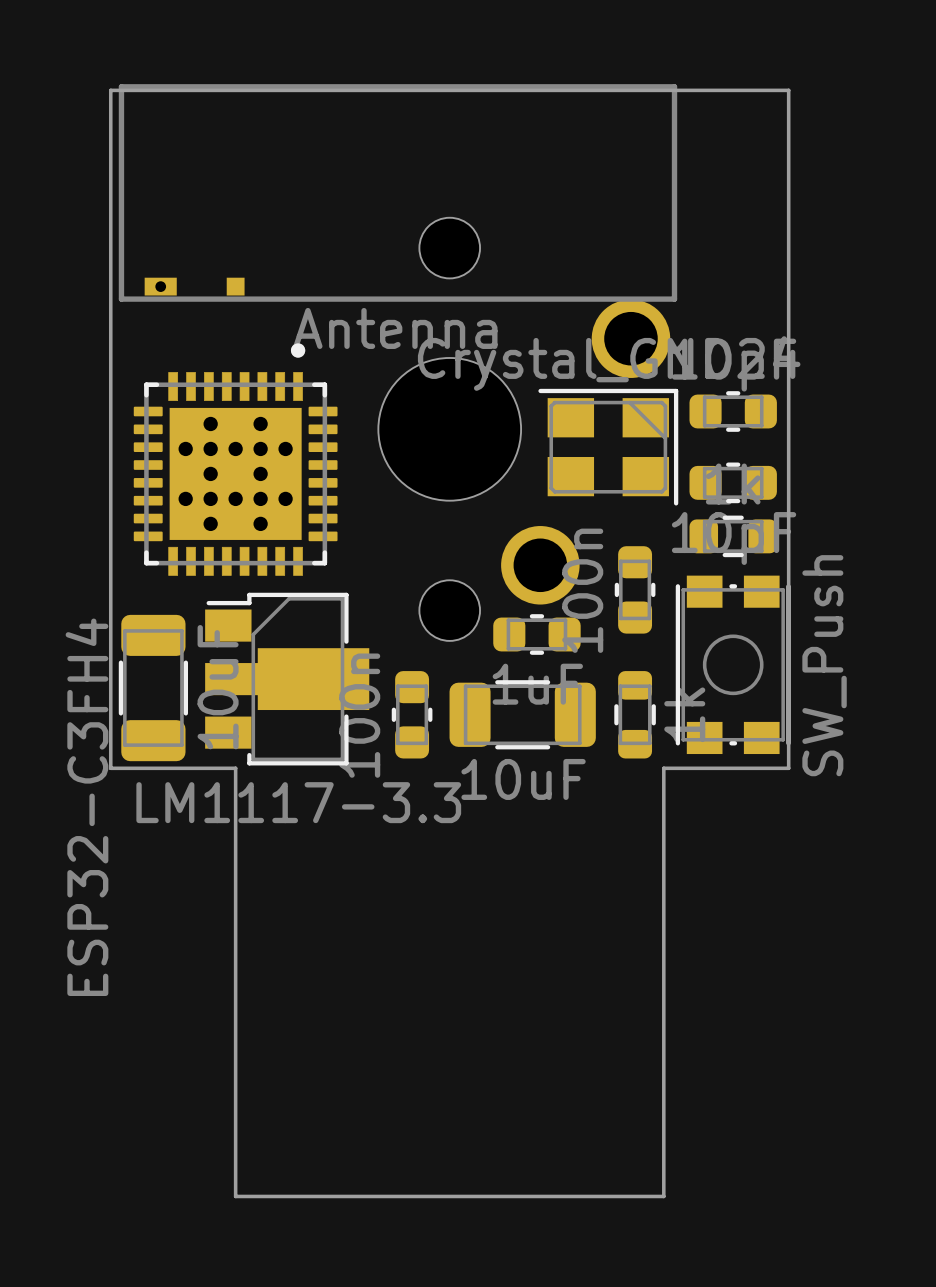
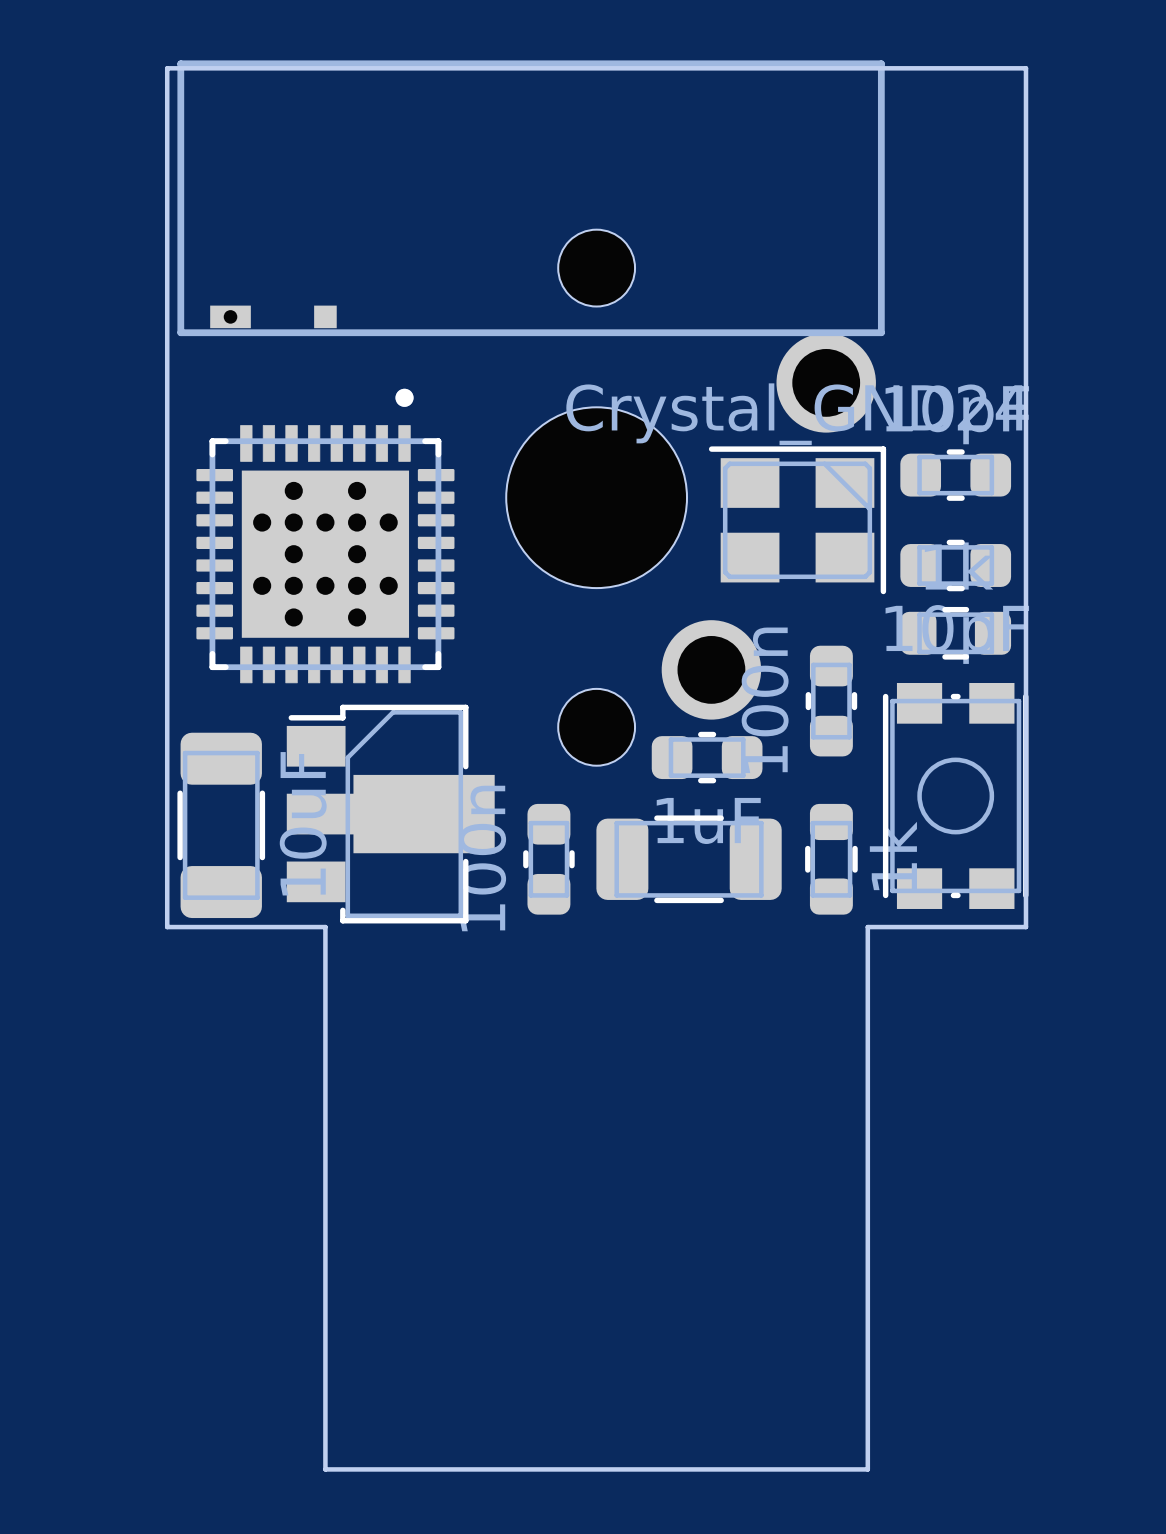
part value: Antenna (395, 328) -> none
part value: SW_Push (824, 665) -> none
part value: 10uF (523, 779) -> none
part value: LM1117-3.3 (298, 802) -> none
part value: ESP32-C3FH4 (86, 807) -> none

